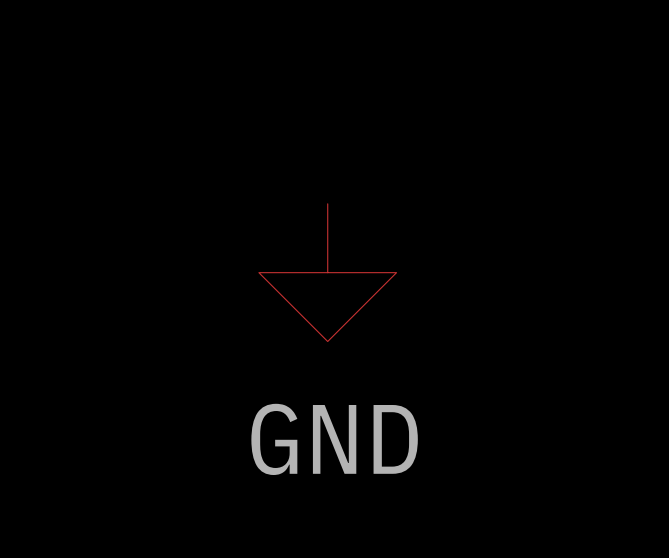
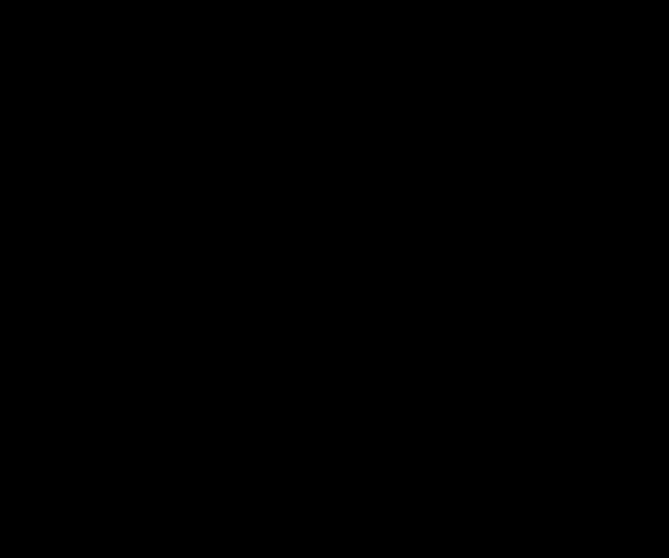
power symbol: GND (327, 272) -> none

